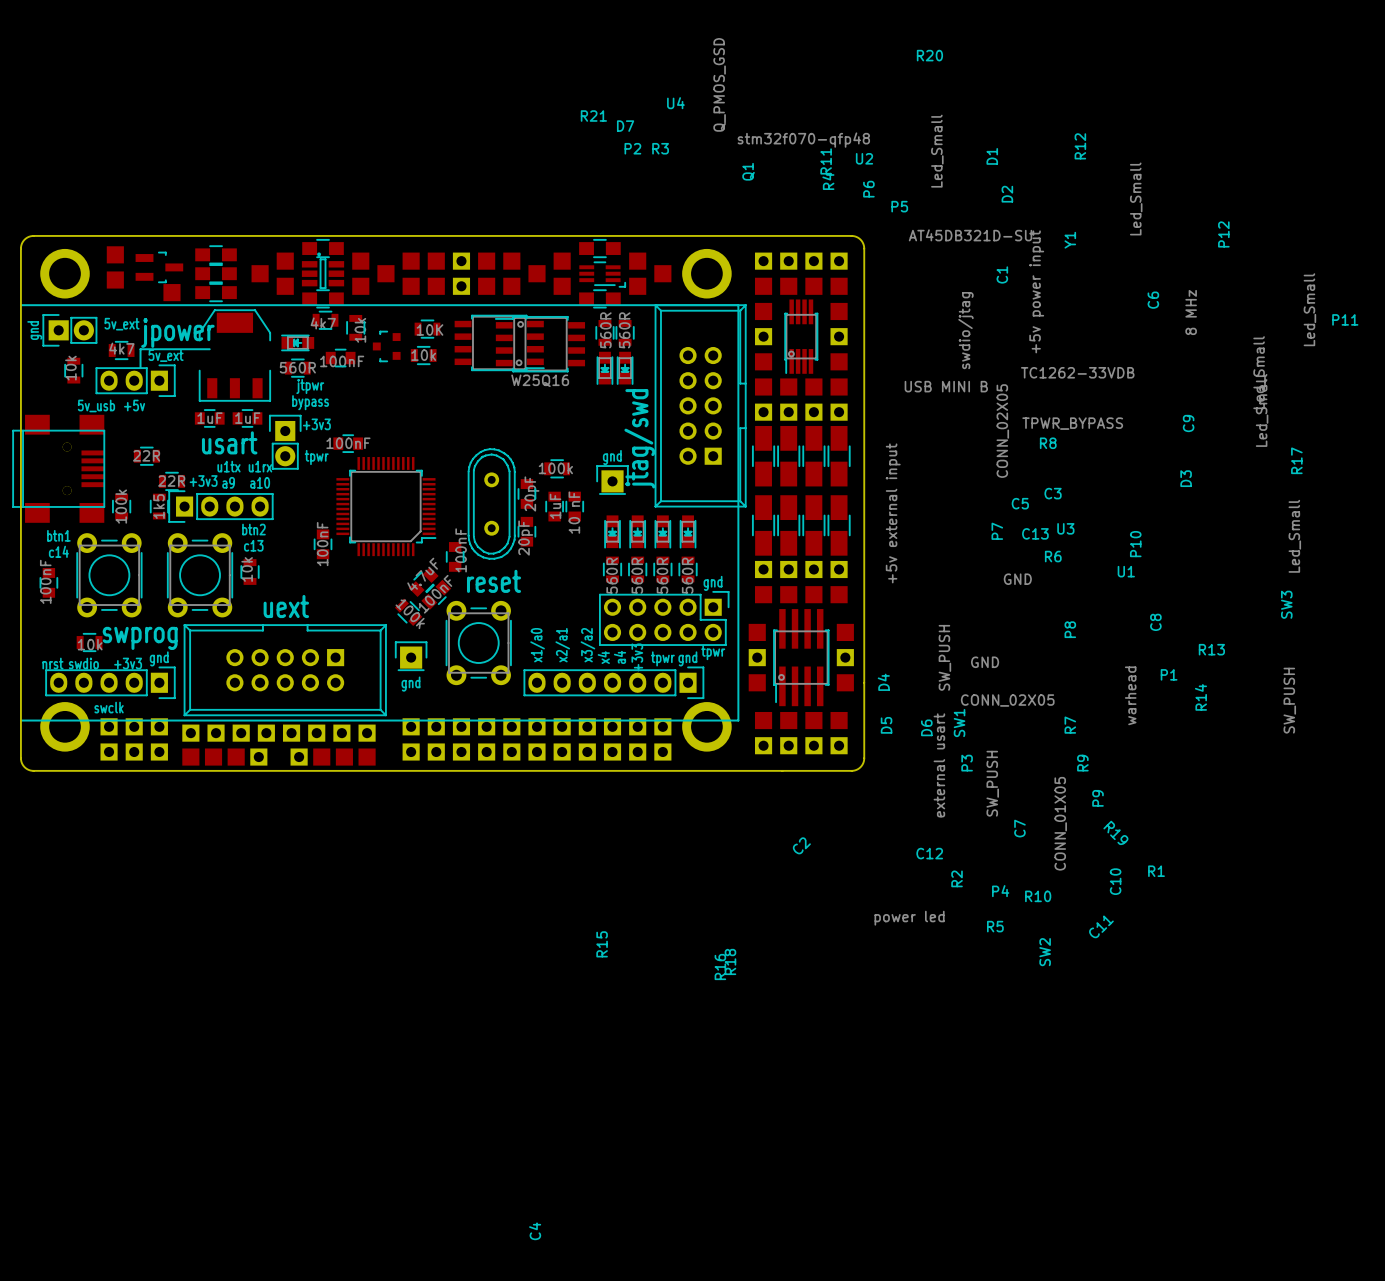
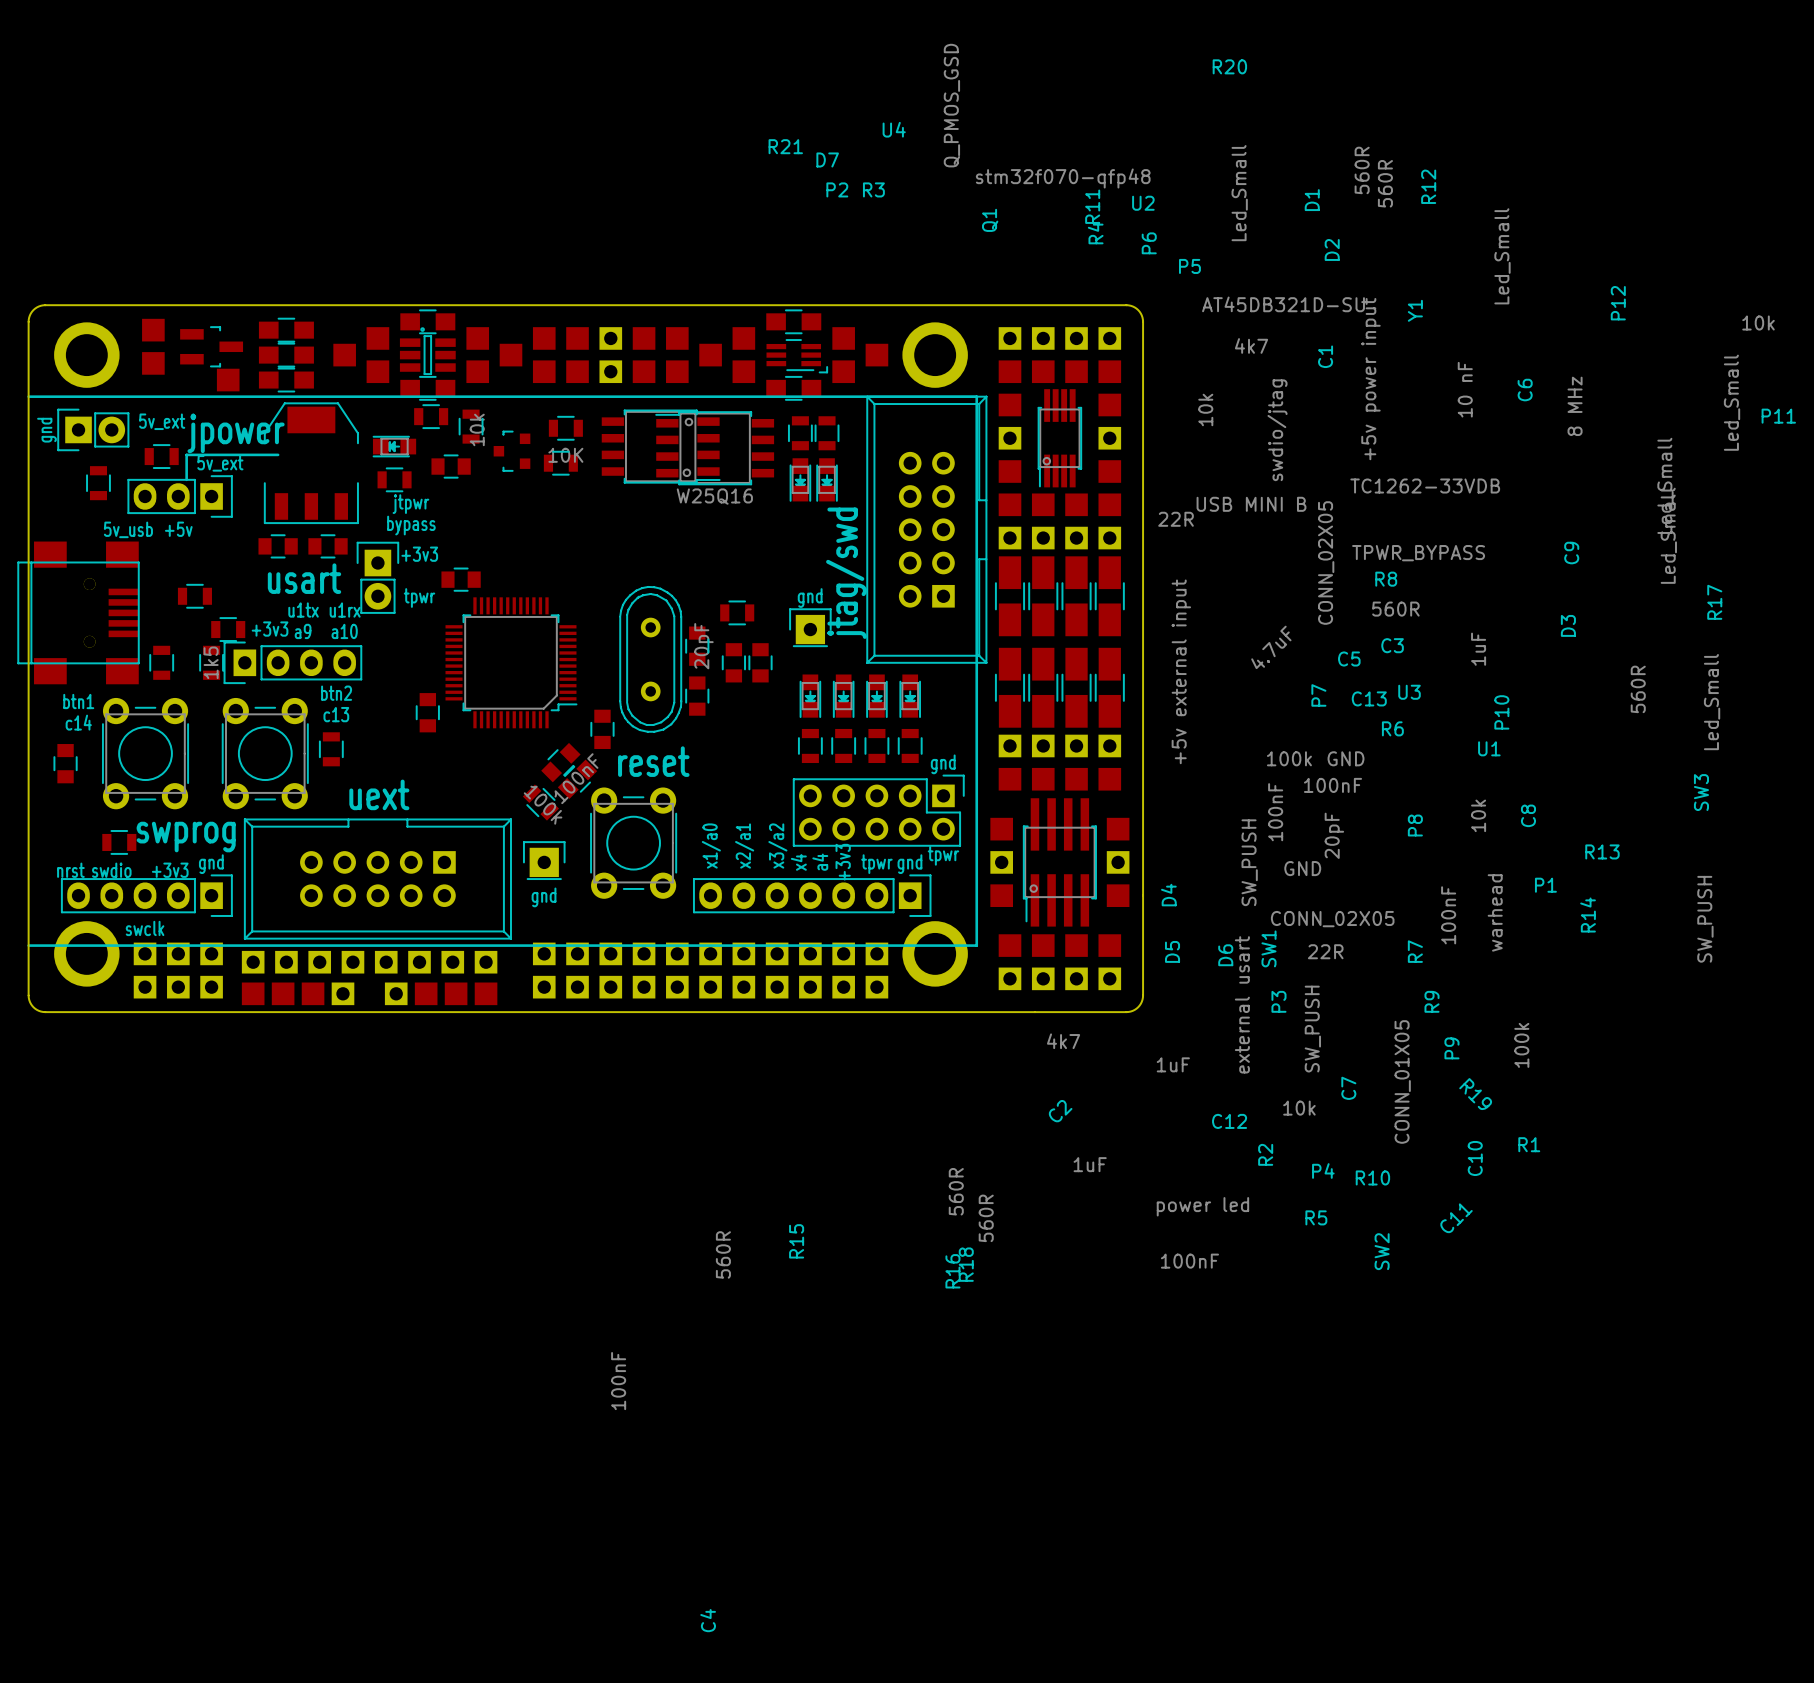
R5 value position: 4k7 (323, 323) -> 4k7 (1063, 1041)
R21 value position: 10K (430, 329) -> 10K (565, 455)
R11 value position: 560R (605, 330) -> 560R (1362, 170)
R12 value position: 560R (624, 330) -> 560R (1385, 183)
R1 value position: 4k7 (121, 348) -> 4k7 (1251, 345)
R3 value position: 10k (423, 355) -> 10k (1758, 323)
C3 value position: 100nF (342, 361) -> 100nF (1189, 1261)
R20 value position: 560R (297, 367) -> 560R (1395, 609)
R2 value position: 10k (70, 368) -> 10k (1205, 409)
C12 value position: 1uF (209, 418) -> 1uF (1173, 1064)
C13 value position: 1uF (247, 418) -> 1uF (1090, 1164)
C5 value position: 100nF (348, 443) -> 100nF (1333, 785)
R6 value position: 22R (146, 455) -> 22R (1176, 519)
R10 value position: 100k (555, 468) -> 100k (1289, 758)
R8 value position: 22R (171, 481) -> 22R (1325, 951)
R9 value position: 100k (121, 506) -> 100k (1521, 1045)
C10 value position: 1uF (555, 506) -> 1uF (1478, 649)
C9 value position: 10 nF (574, 512) -> 10 nF (1465, 389)
C6 value position: 20pF (525, 538) -> 20pF (1334, 835)
C1 value position: 100nF (322, 544) -> 100nF (1275, 812)
C4 value position: 100nF (461, 550) -> 100nF (618, 1381)
R14 value position: 10k (247, 569) -> 10k (1478, 815)
C11 value position: 4.7uF (422, 574) -> 4.7uF (1271, 647)
R15 value position: 560R (612, 575) -> 560R (1638, 689)
R16 value position: 560R (637, 575) -> 560R (986, 1218)
R17 value position: 560R (662, 575) -> 560R (723, 1254)
R18 value position: 560R (687, 575) -> 560R (956, 1191)
C8 value position: 100nF (45, 581) -> 100nF (1448, 915)
R13 value position: 10k (90, 644) -> 10k (1299, 1108)

